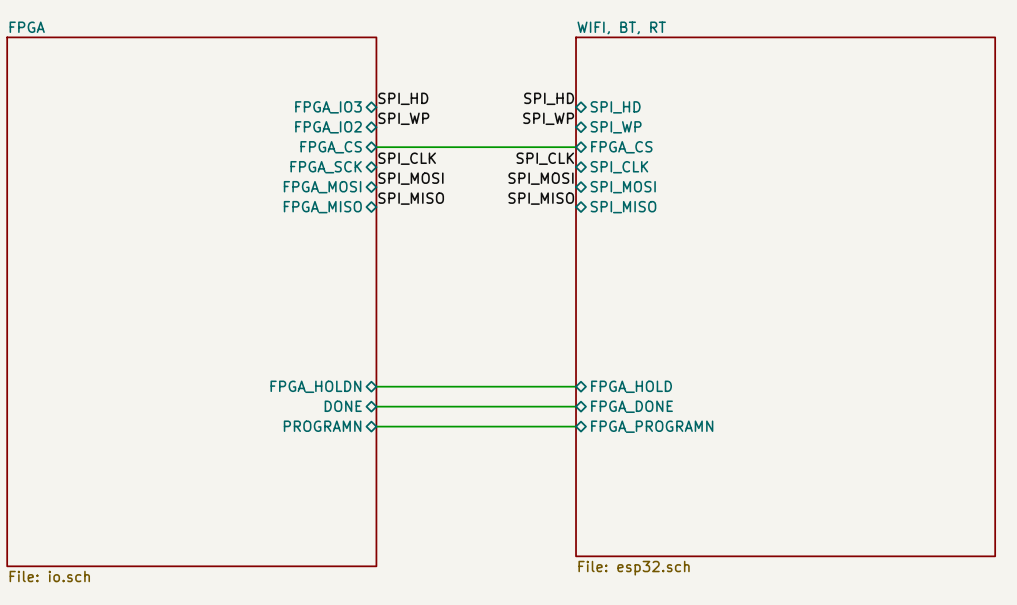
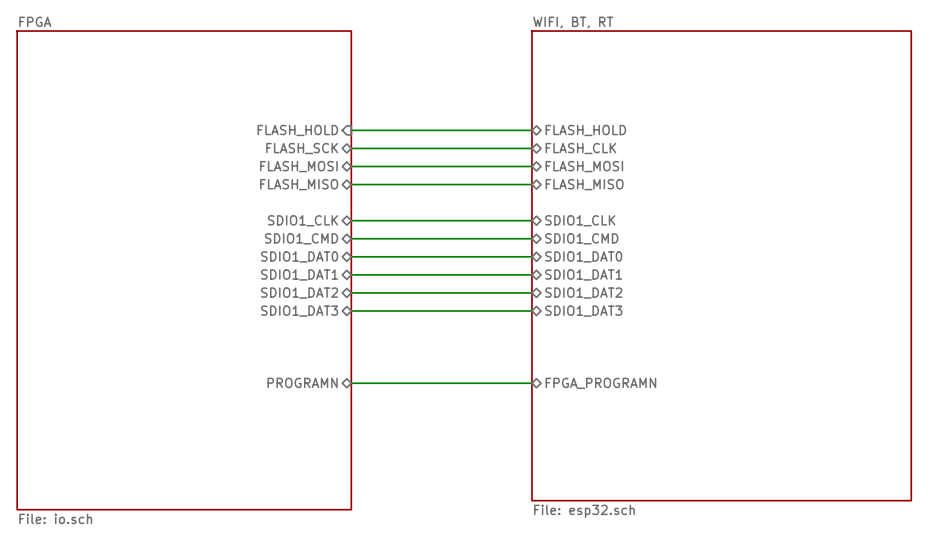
label: SPI_HD (403, 98) -> none
label: SPI_HD (549, 98) -> none
sheet pin: FPGA_IO3 (328, 107) -> none
sheet pin: SPI_HD (615, 107) -> none
label: SPI_WP (403, 118) -> none
label: SPI_WP (548, 118) -> none
sheet pin: FPGA_IO2 (328, 127) -> none
sheet pin: SPI_WP (616, 127) -> none
sheet pin shape: bidirectional (331, 147) -> input (297, 130)
sheet pin: FPGA_CS (331, 147) -> FLASH_HOLD (297, 130)
sheet pin: FPGA_CS (621, 147) -> FLASH_HOLD (585, 130)
label: SPI_CLK (407, 158) -> none
label: SPI_CLK (545, 158) -> none
sheet pin: FPGA_SCK (326, 167) -> FLASH_SCK (302, 148)
wire: none -> (351, 148) (531, 148)
sheet pin: SPI_CLK (619, 167) -> FLASH_CLK (580, 148)
label: SPI_MOSI (410, 178) -> none
label: SPI_MOSI (541, 178) -> none
sheet pin: FPGA_MOSI (322, 187) -> FLASH_MOSI (298, 166)
wire: none -> (351, 166) (531, 166)
sheet pin: SPI_MOSI (623, 187) -> FLASH_MOSI (584, 166)
label: SPI_MISO (411, 198) -> none
label: SPI_MISO (541, 198) -> none
sheet pin: FPGA_MISO (322, 207) -> FLASH_MISO (299, 184)
wire: none -> (351, 184) (531, 184)
sheet pin: SPI_MISO (623, 207) -> FLASH_MISO (584, 184)
wire: none -> (351, 220) (531, 220)
sheet pin: none -> SDIO1_CLK (303, 220)
sheet pin: none -> SDIO1_CLK (580, 220)
wire: none -> (351, 238) (531, 238)
sheet pin: none -> SDIO1_CMD (301, 238)
sheet pin: none -> SDIO1_CMD (581, 238)
sheet pin: none -> SDIO1_DAT0 (299, 256)
wire: none -> (351, 256) (531, 256)
sheet pin: none -> SDIO1_DAT0 (583, 256)
sheet pin: none -> SDIO1_DAT1 (299, 274)
wire: none -> (351, 274) (531, 274)
sheet pin: none -> SDIO1_DAT1 (583, 274)
sheet pin: none -> SDIO1_DAT2 (299, 293)
sheet pin: none -> SDIO1_DAT2 (583, 293)
sheet pin: none -> SDIO1_DAT3 (299, 311)
sheet pin: none -> SDIO1_DAT3 (583, 311)
sheet pin: FPGA_HOLDN (315, 386) -> none
wire: (376, 386) (576, 386) -> (351, 292) (531, 292)
sheet pin: FPGA_HOLD (631, 386) -> none
sheet pin: DONE (343, 406) -> none
wire: (376, 406) (576, 406) -> (351, 311) (531, 311)
sheet pin: FPGA_DONE (632, 406) -> none

